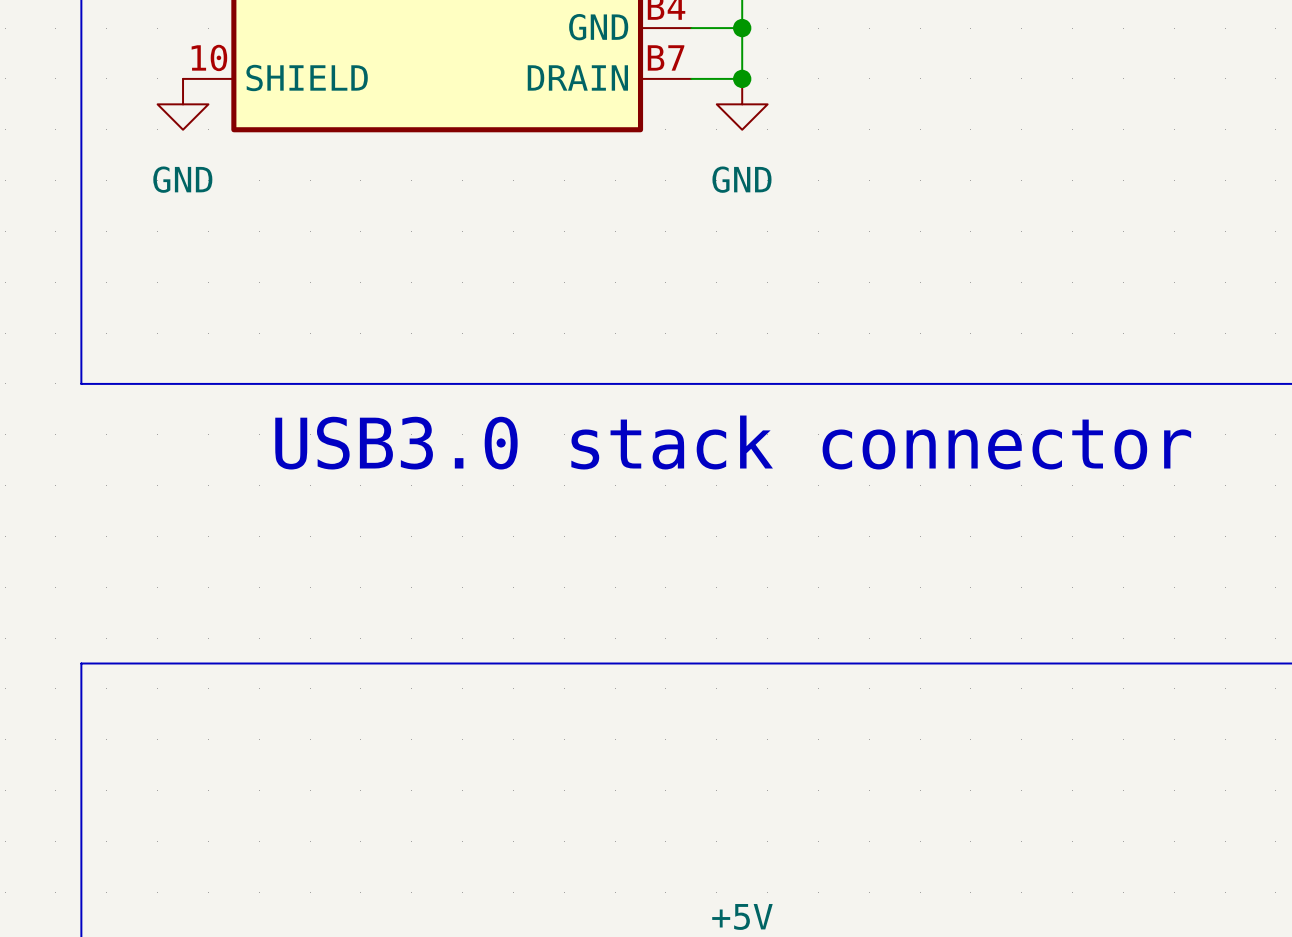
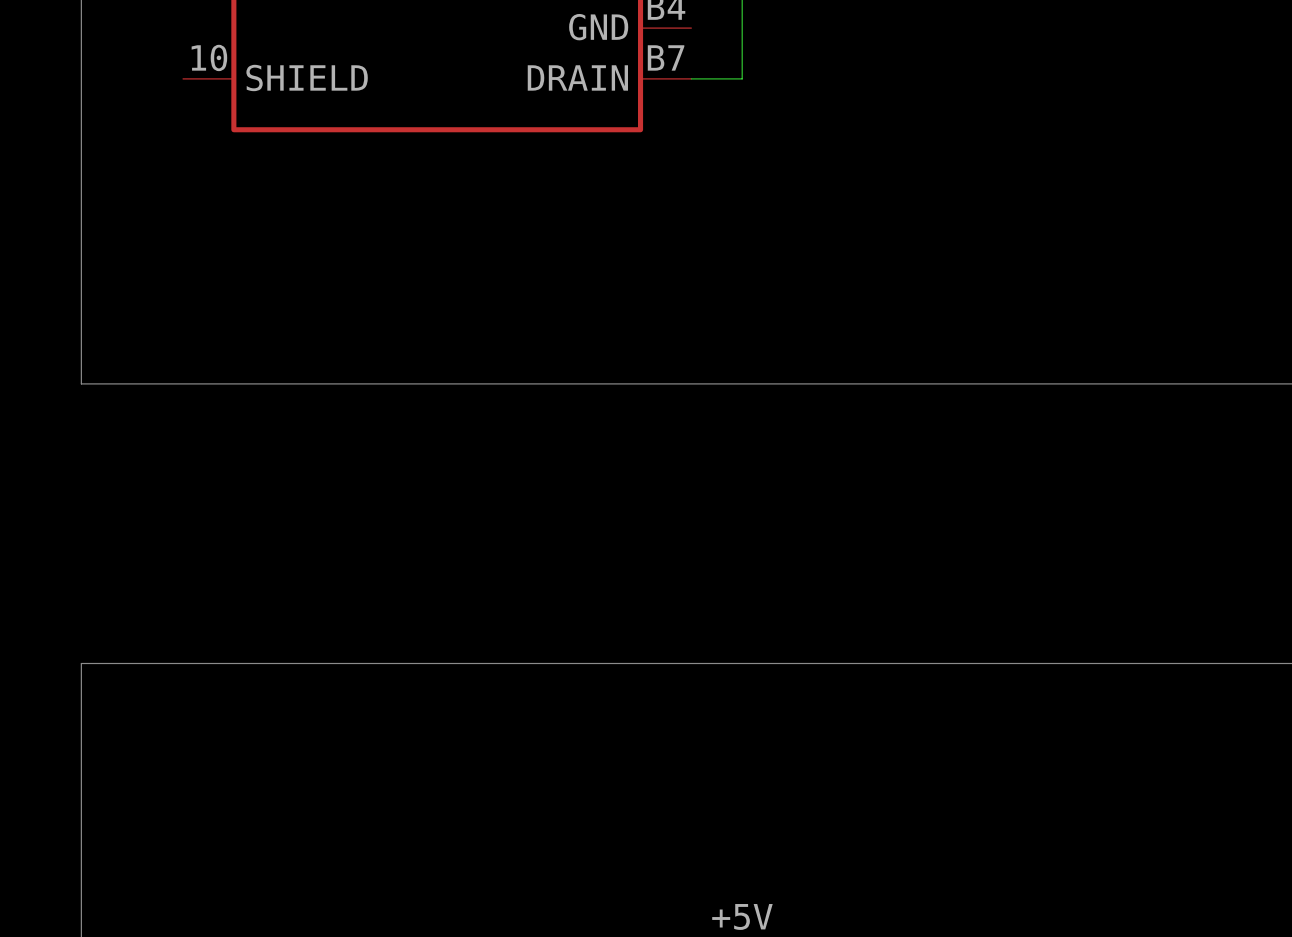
wire: (691, 28) (742, 28) -> none
junction: (742, 28) -> none
junction: (742, 78) -> none
power symbol: GND (183, 104) -> none
power symbol: GND (742, 104) -> none
text: USB3.0 stack connector (733, 442) -> none

